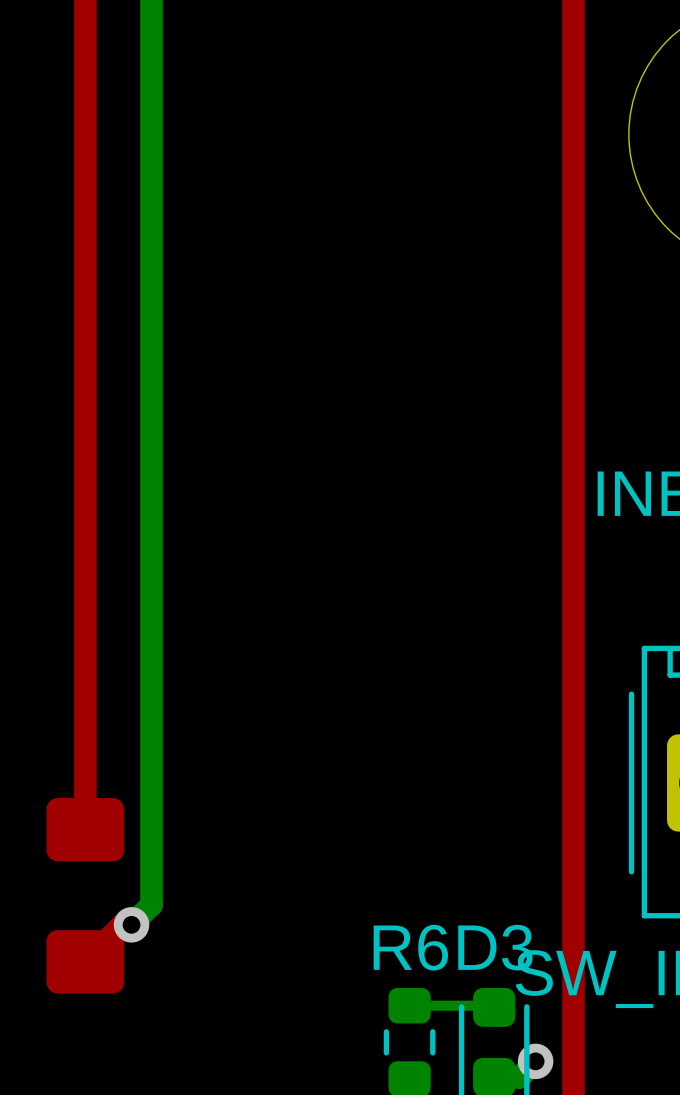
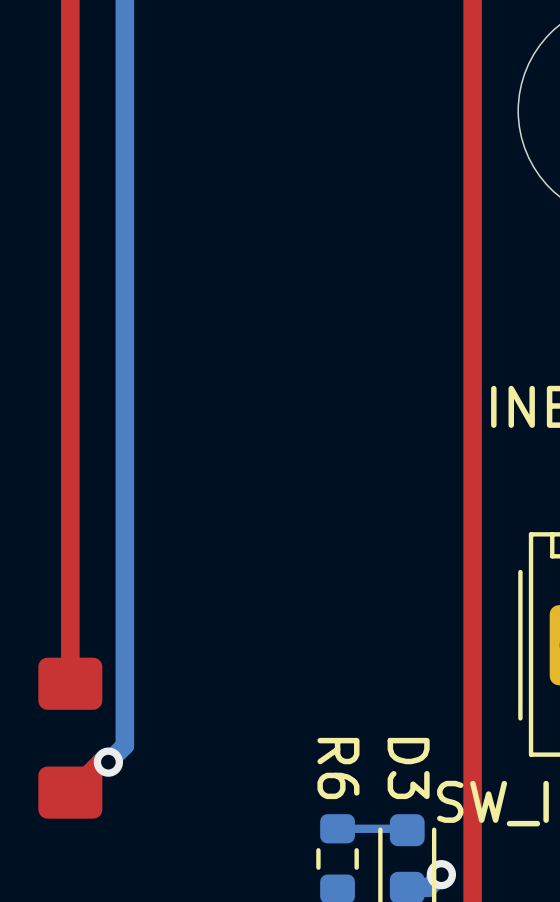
R6 name rotation: 0° (410, 947) -> 90° clockwise (338, 768)
D3 name rotation: 0° (495, 947) -> 90° clockwise (408, 768)

